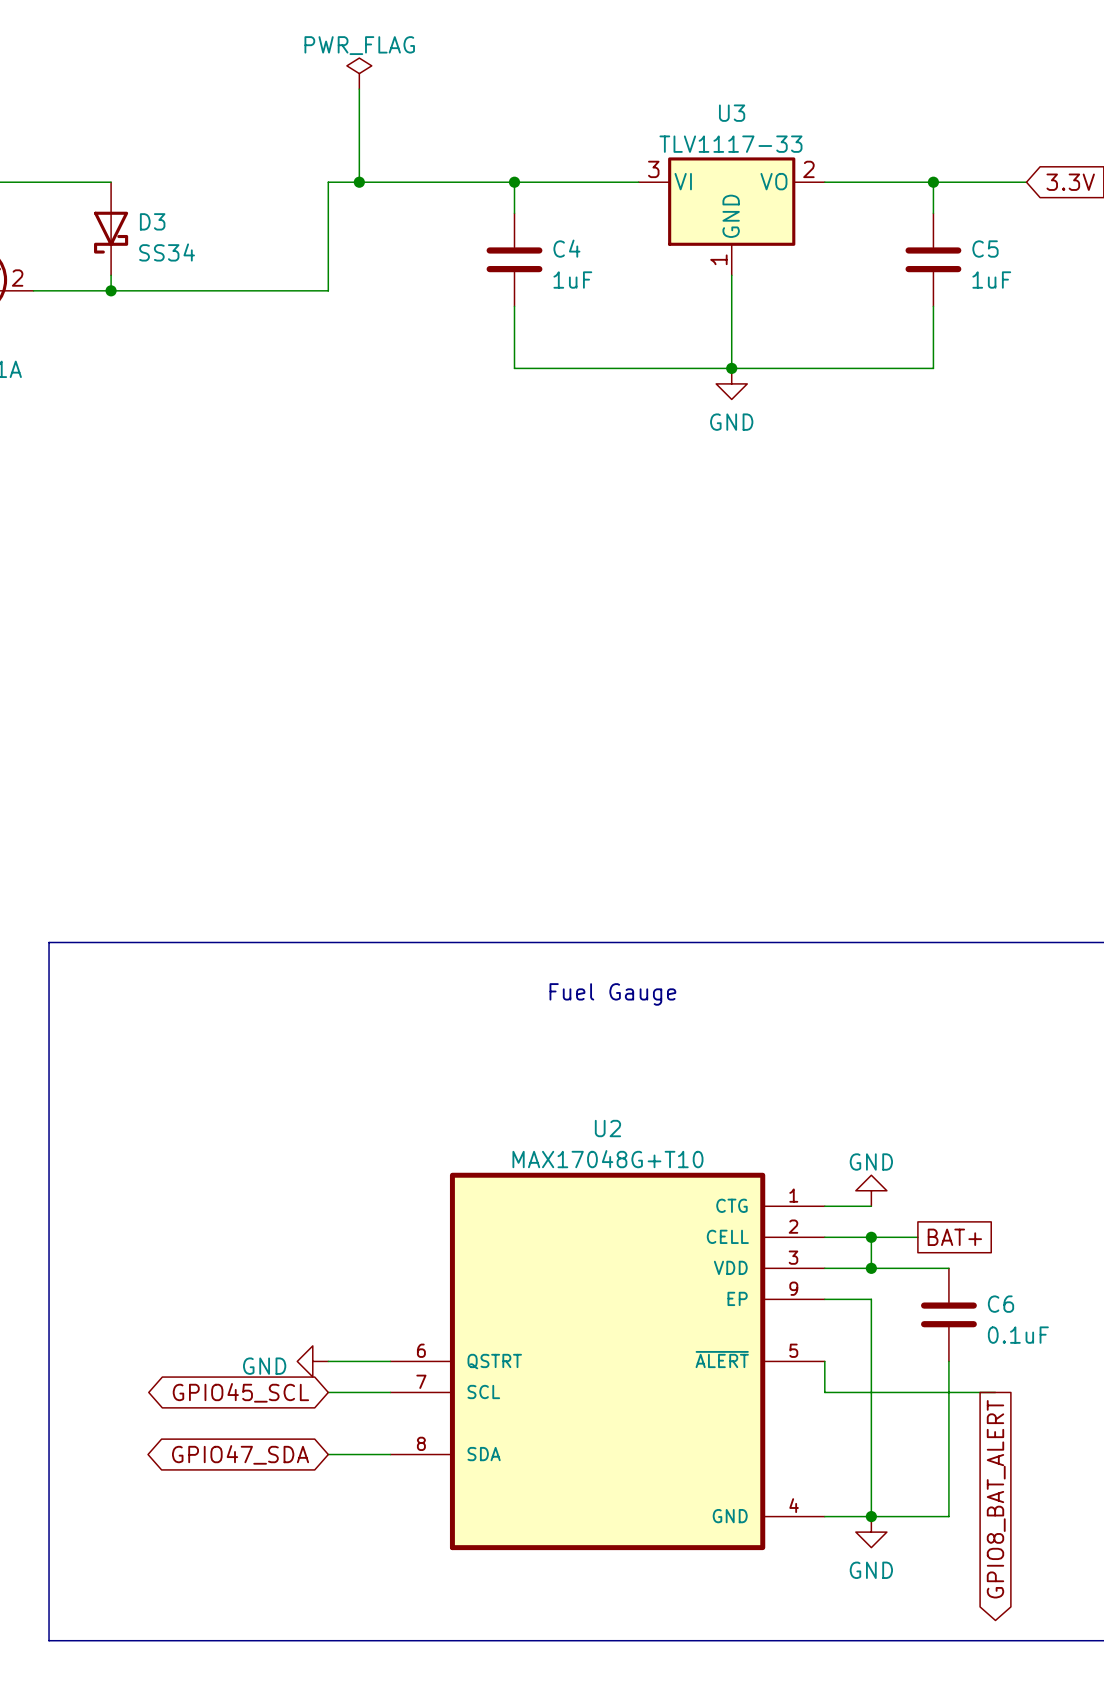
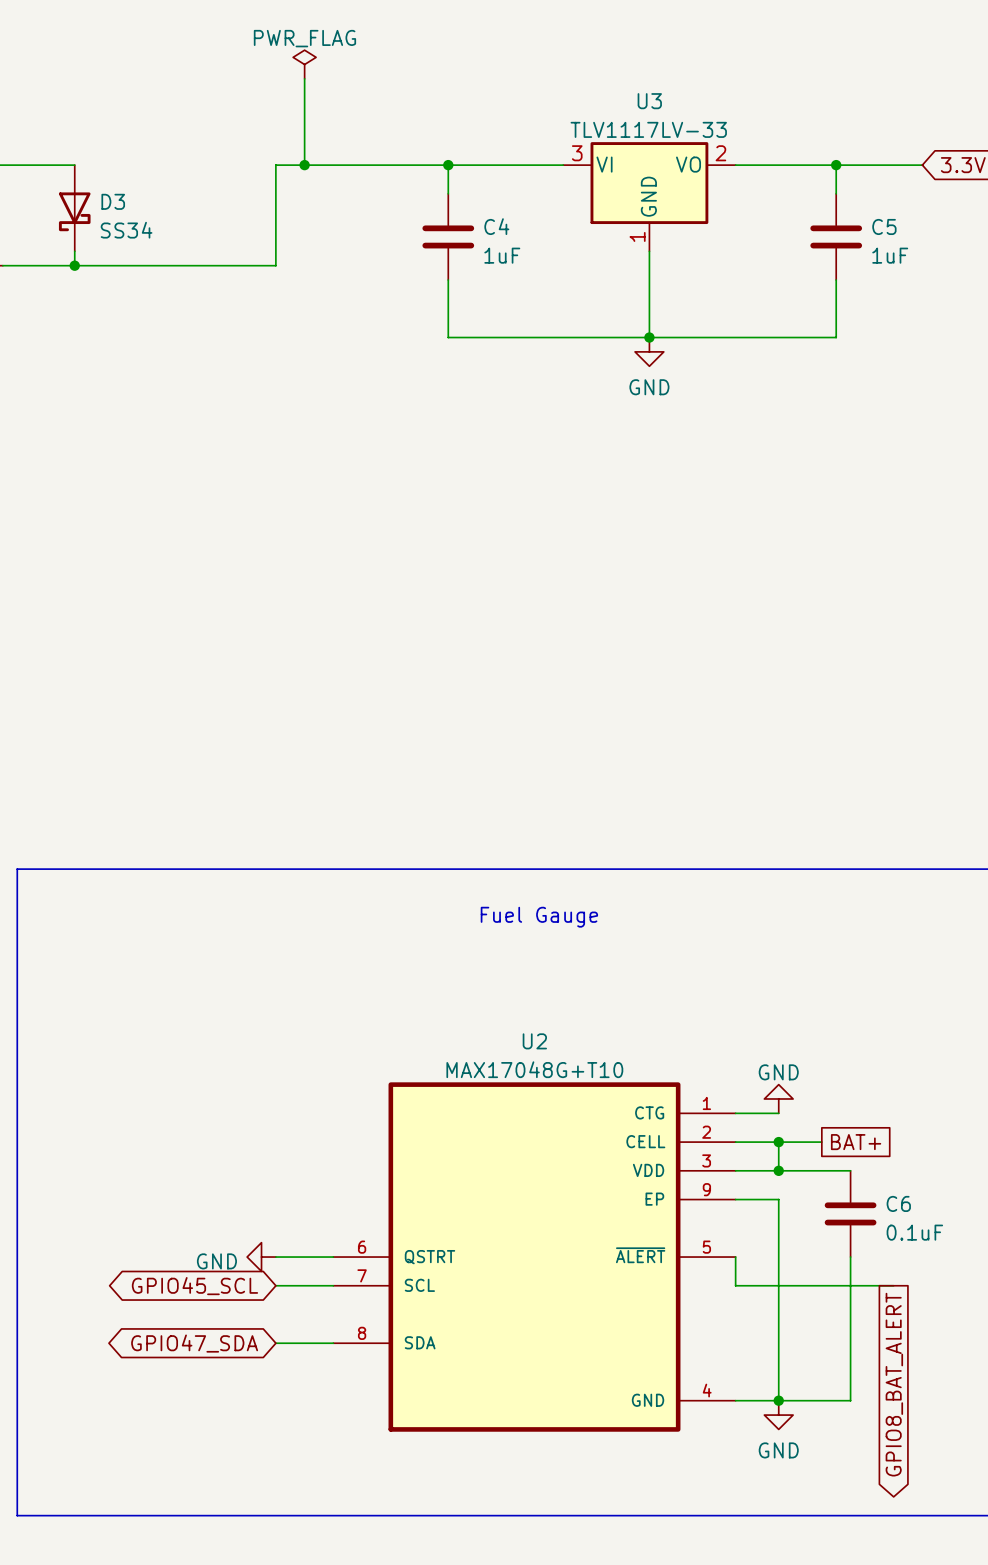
U3 value: TLV1117-33 (730, 144) -> TLV1117LV-33 (648, 129)

